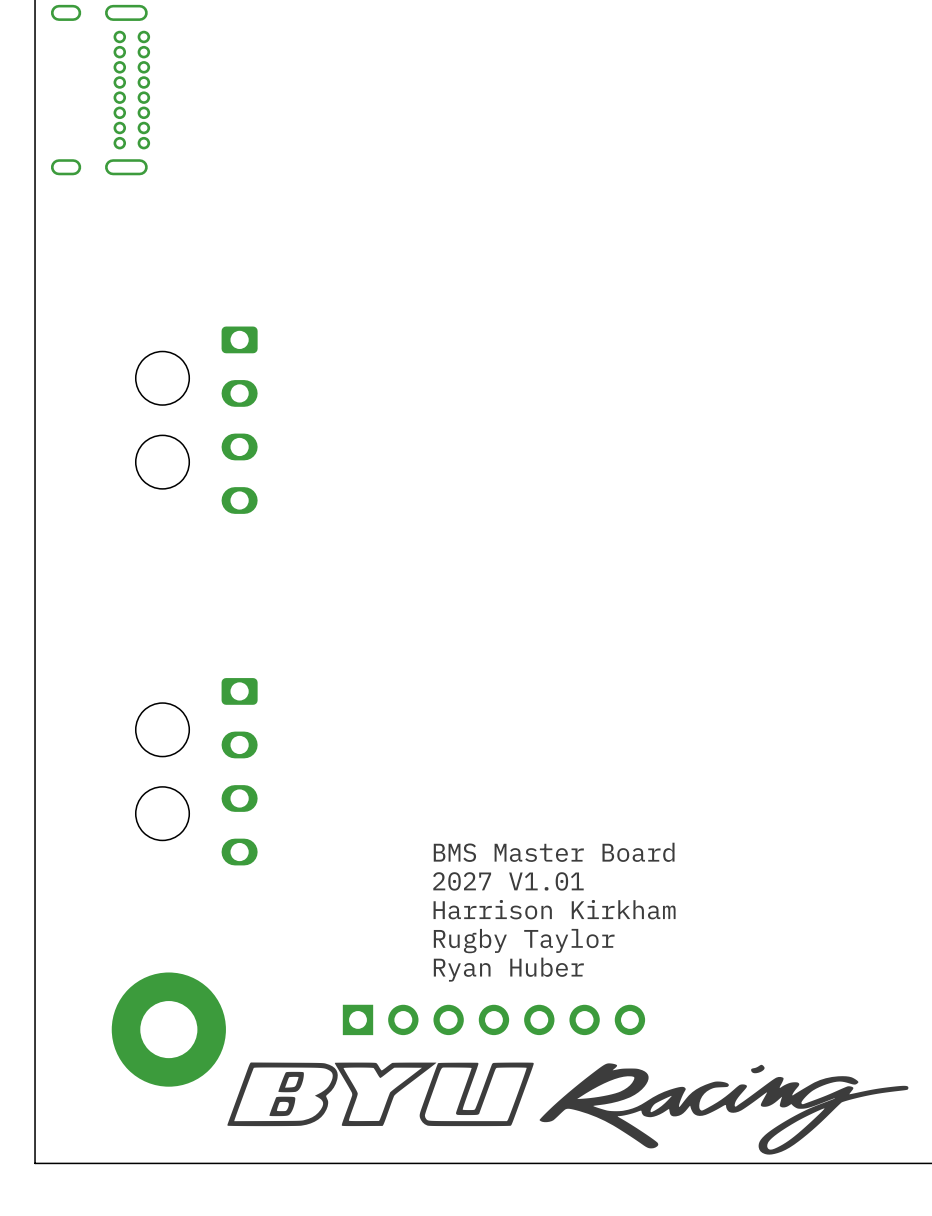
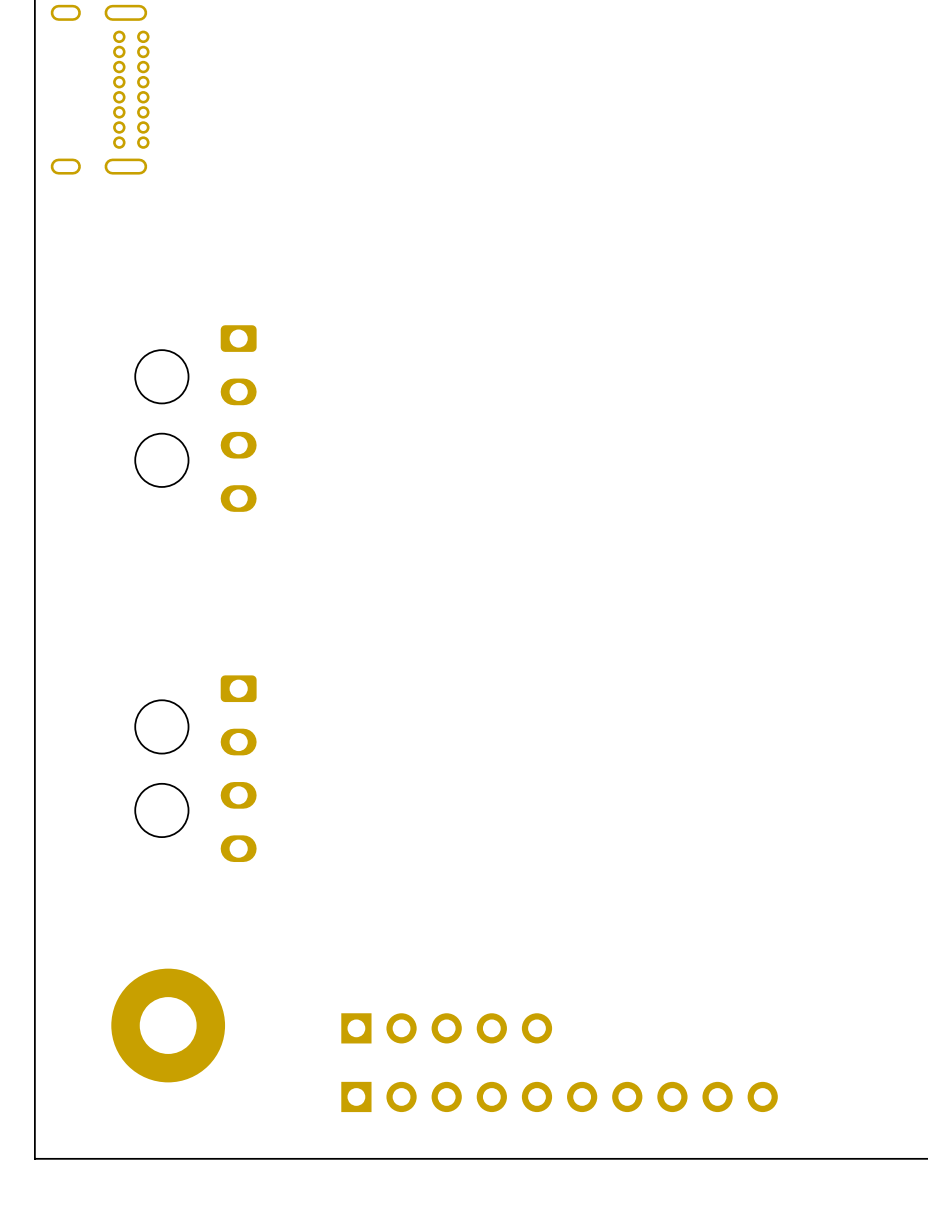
text: BMS Master Board (554, 852) -> none
text: 2027 V1.01 (508, 881) -> none
text: Harrison Kirkham (554, 909) -> none
text: Rugby Taylor (524, 941) -> none
text: Ryan Huber (508, 969) -> none
part: (493, 1019) -> none
part: none -> (446, 1028)
drawing: [227, 1062, 909, 1155] -> none
part: none -> (559, 1096)

